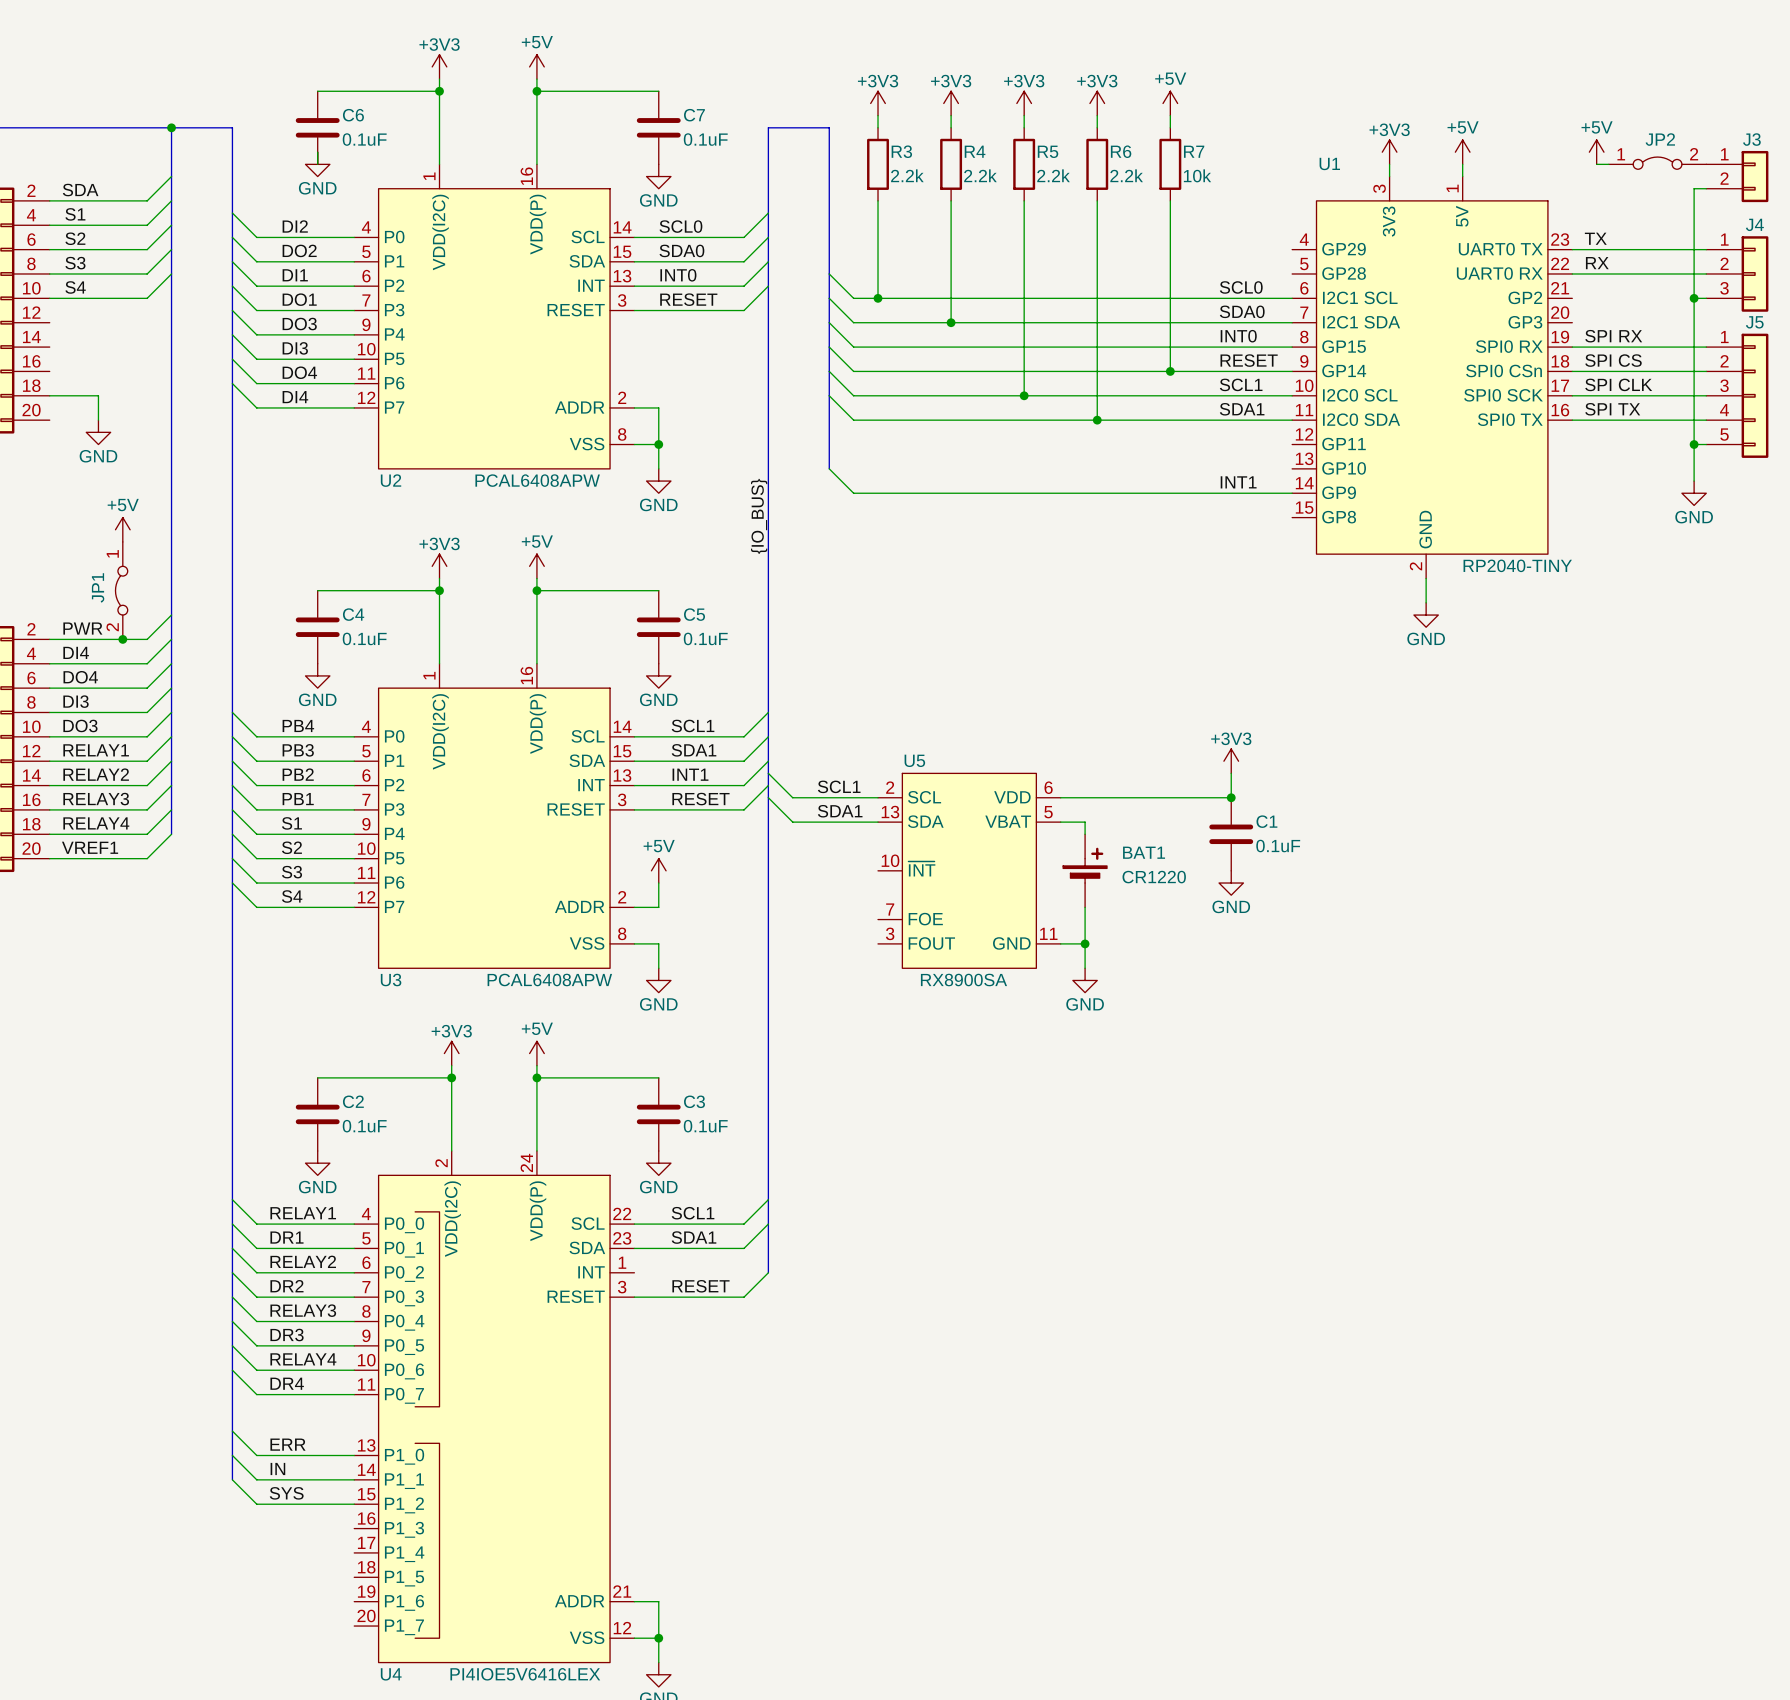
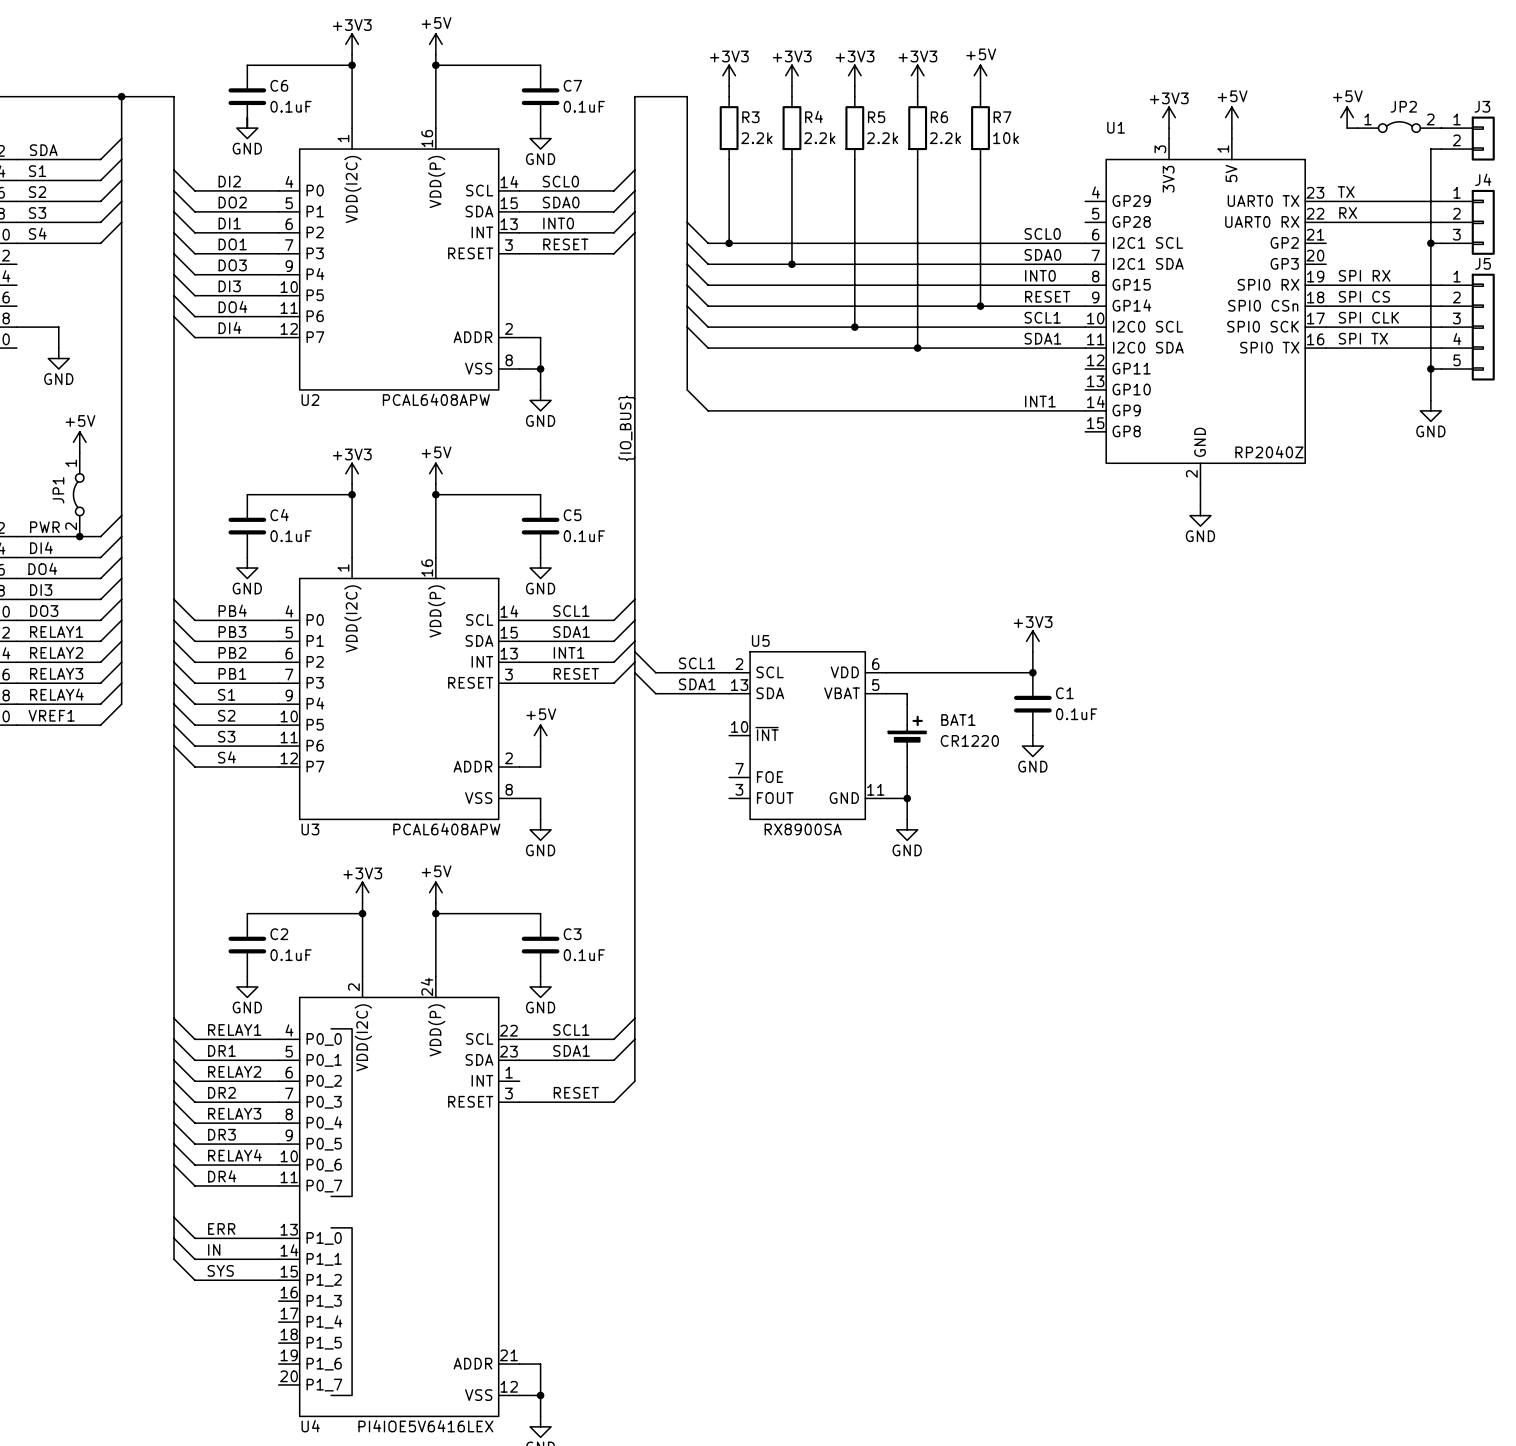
U1 value: RP2040-TINY (1517, 565) -> RP2040Z (1269, 452)

